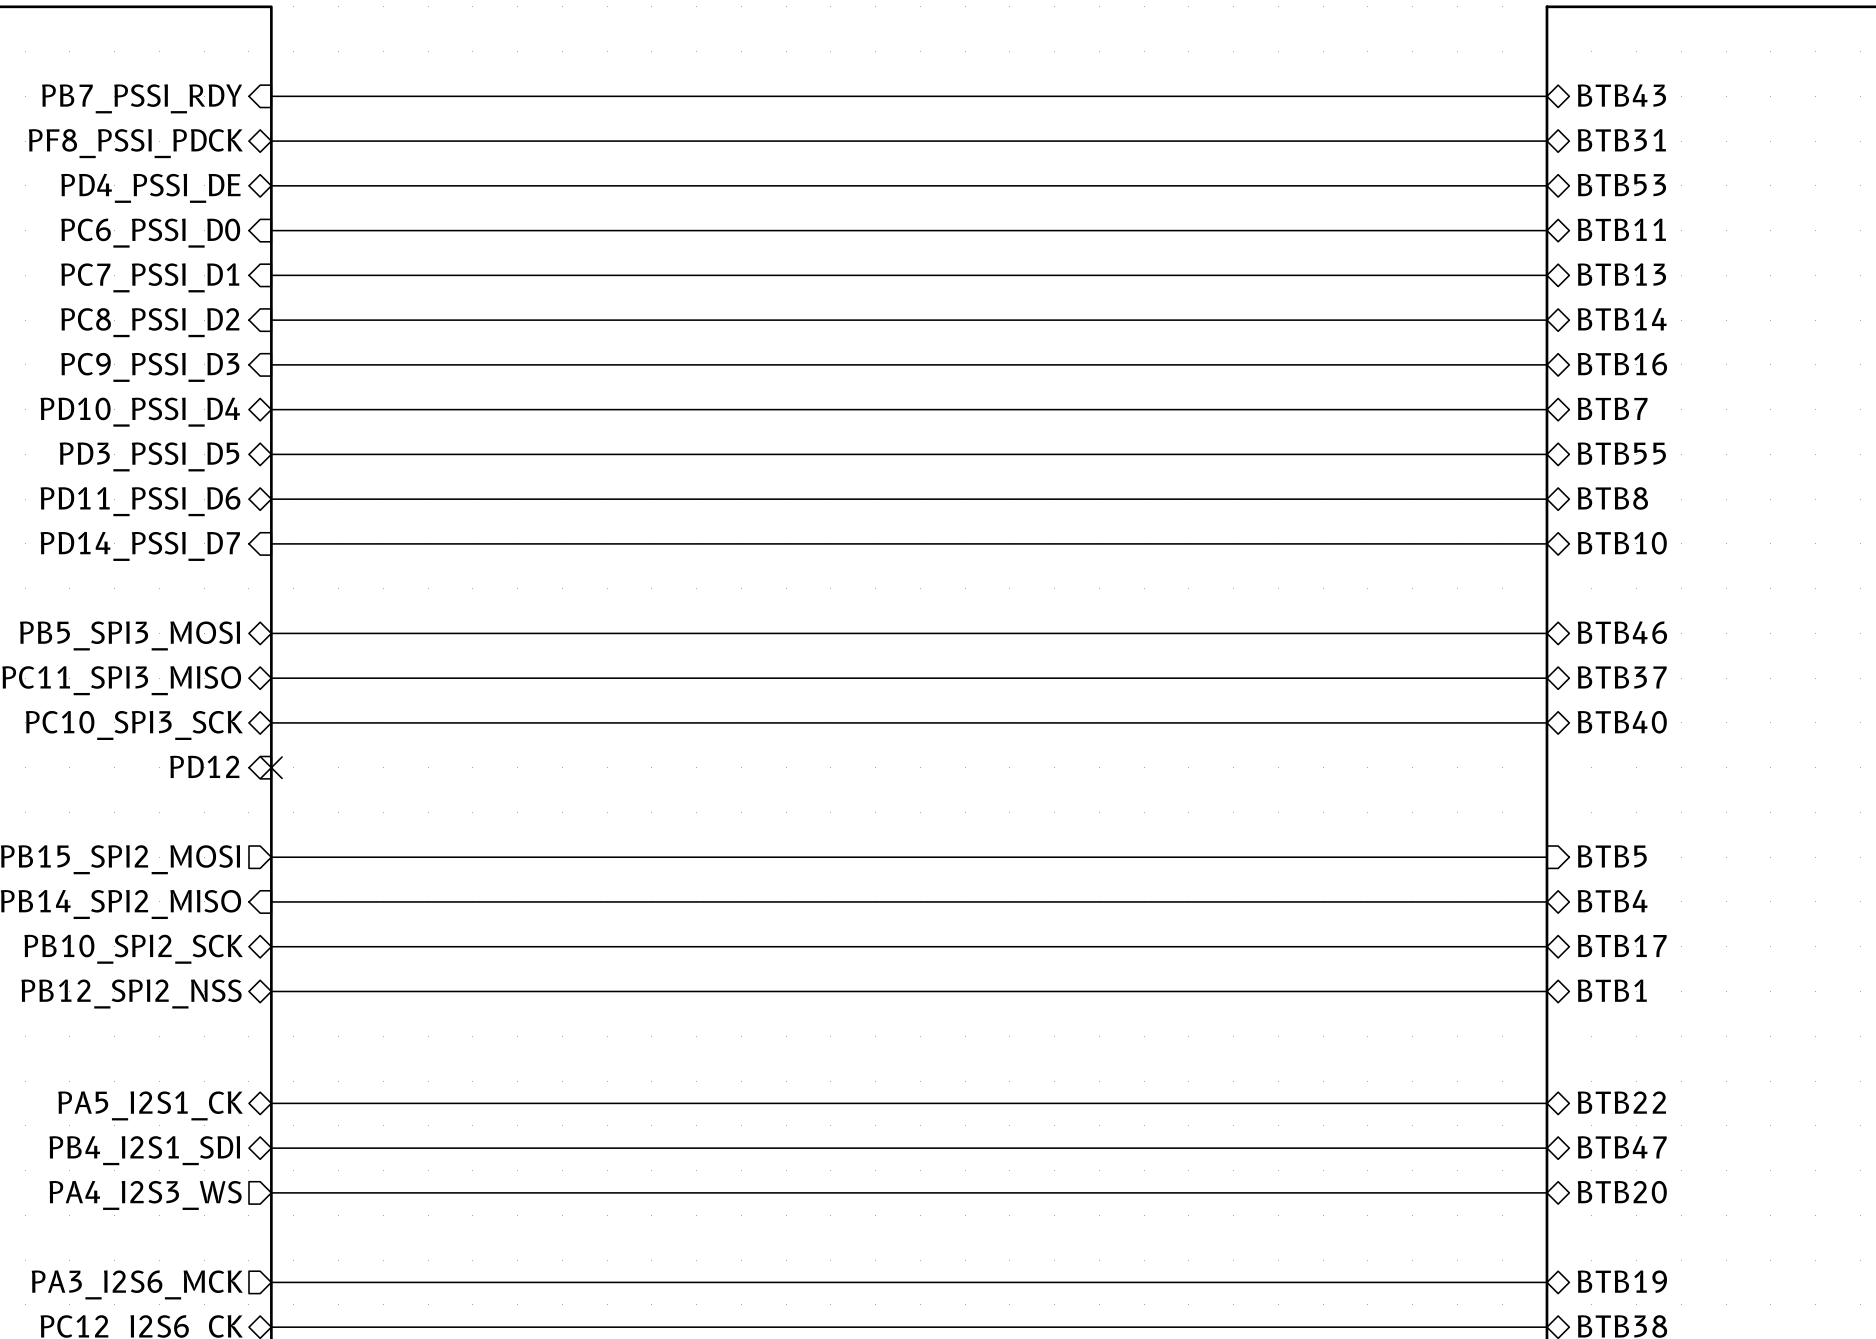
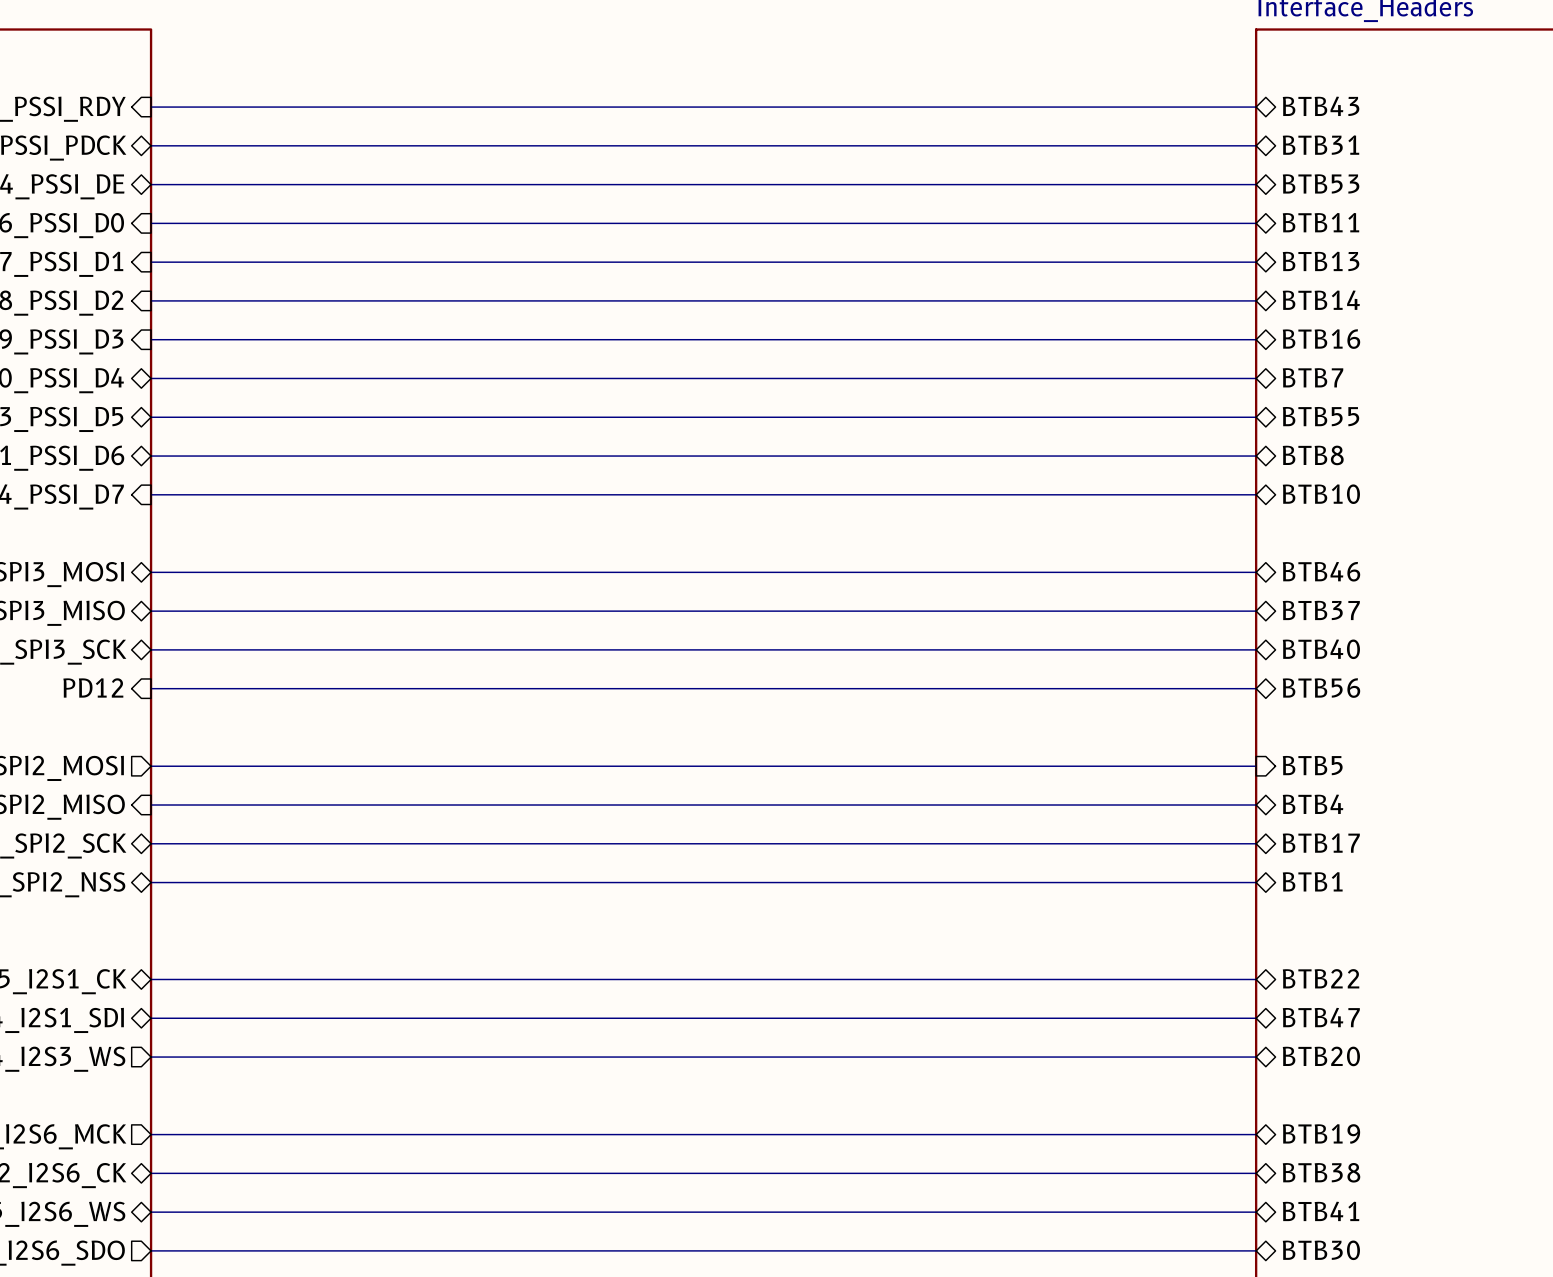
wire: none -> (151, 688) (1256, 688)
no-connect mark: (271, 767) -> none
sheet pin: none -> BTB56 (1321, 688)

